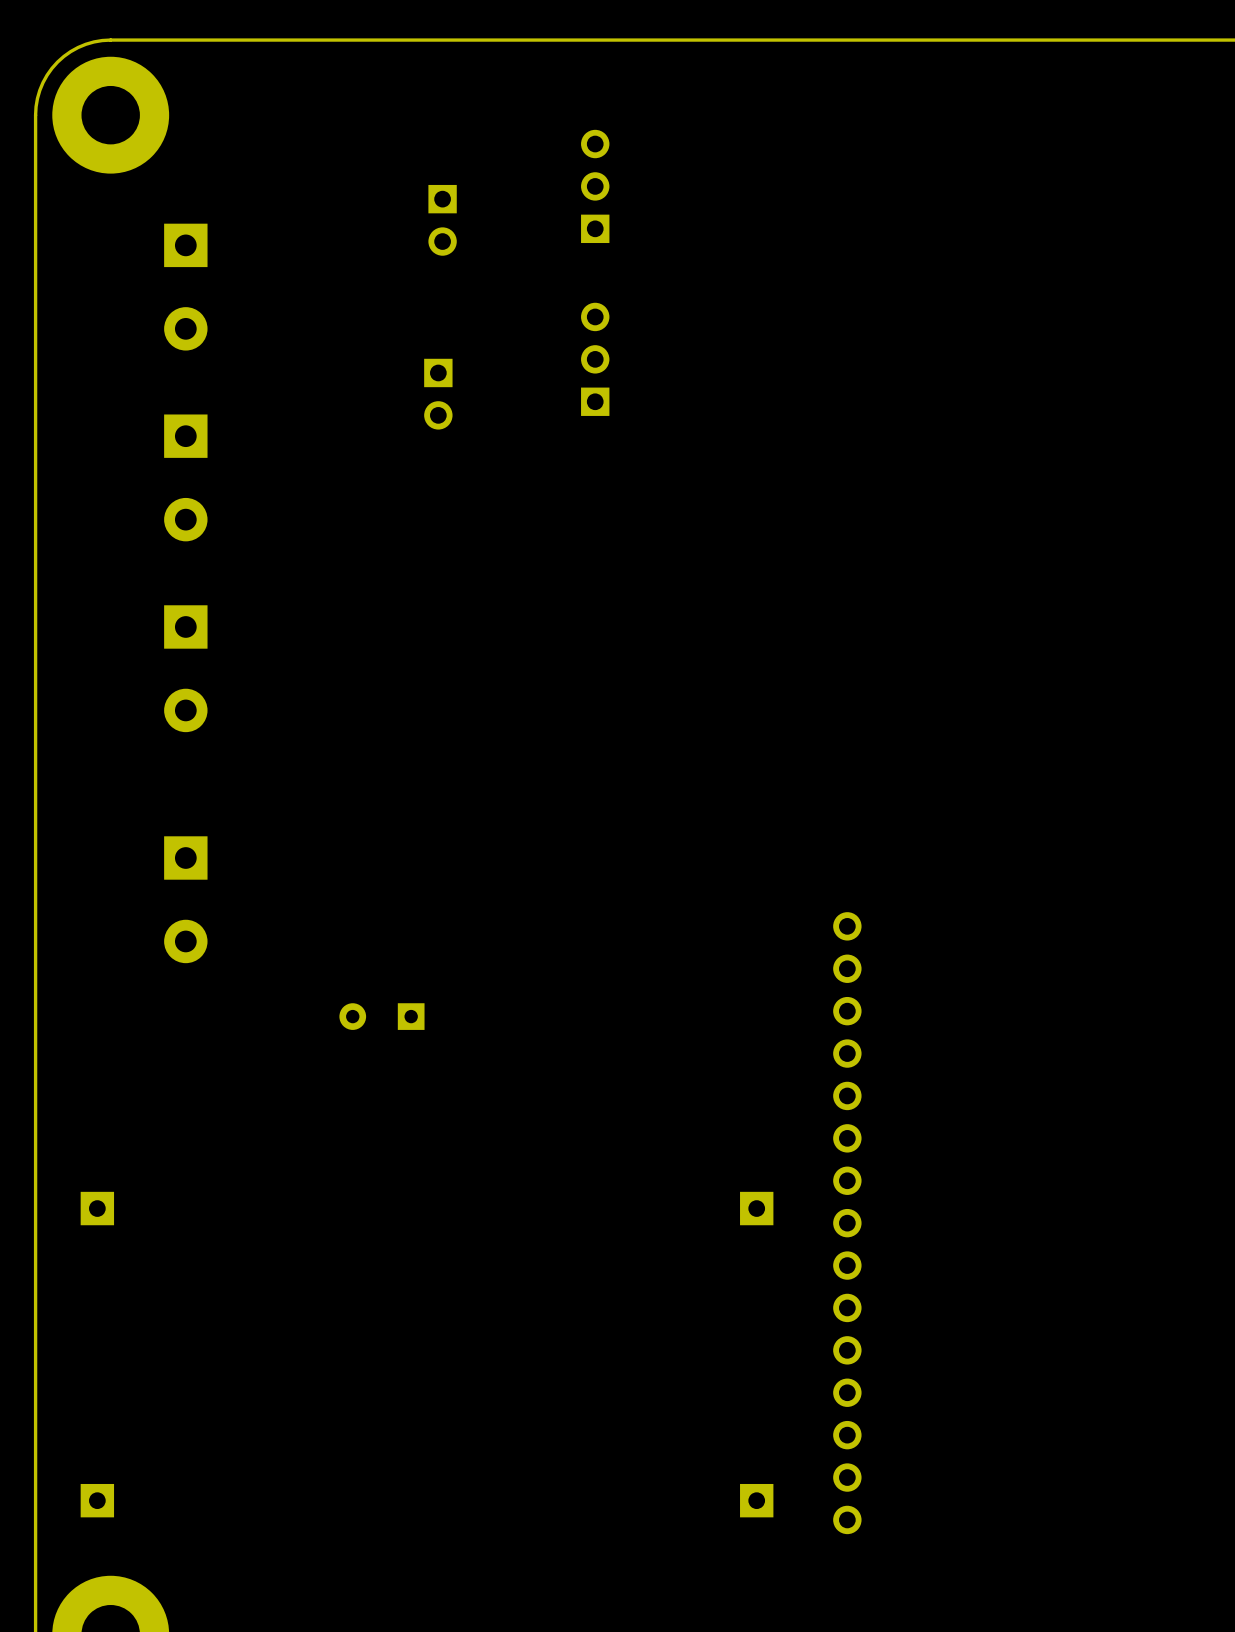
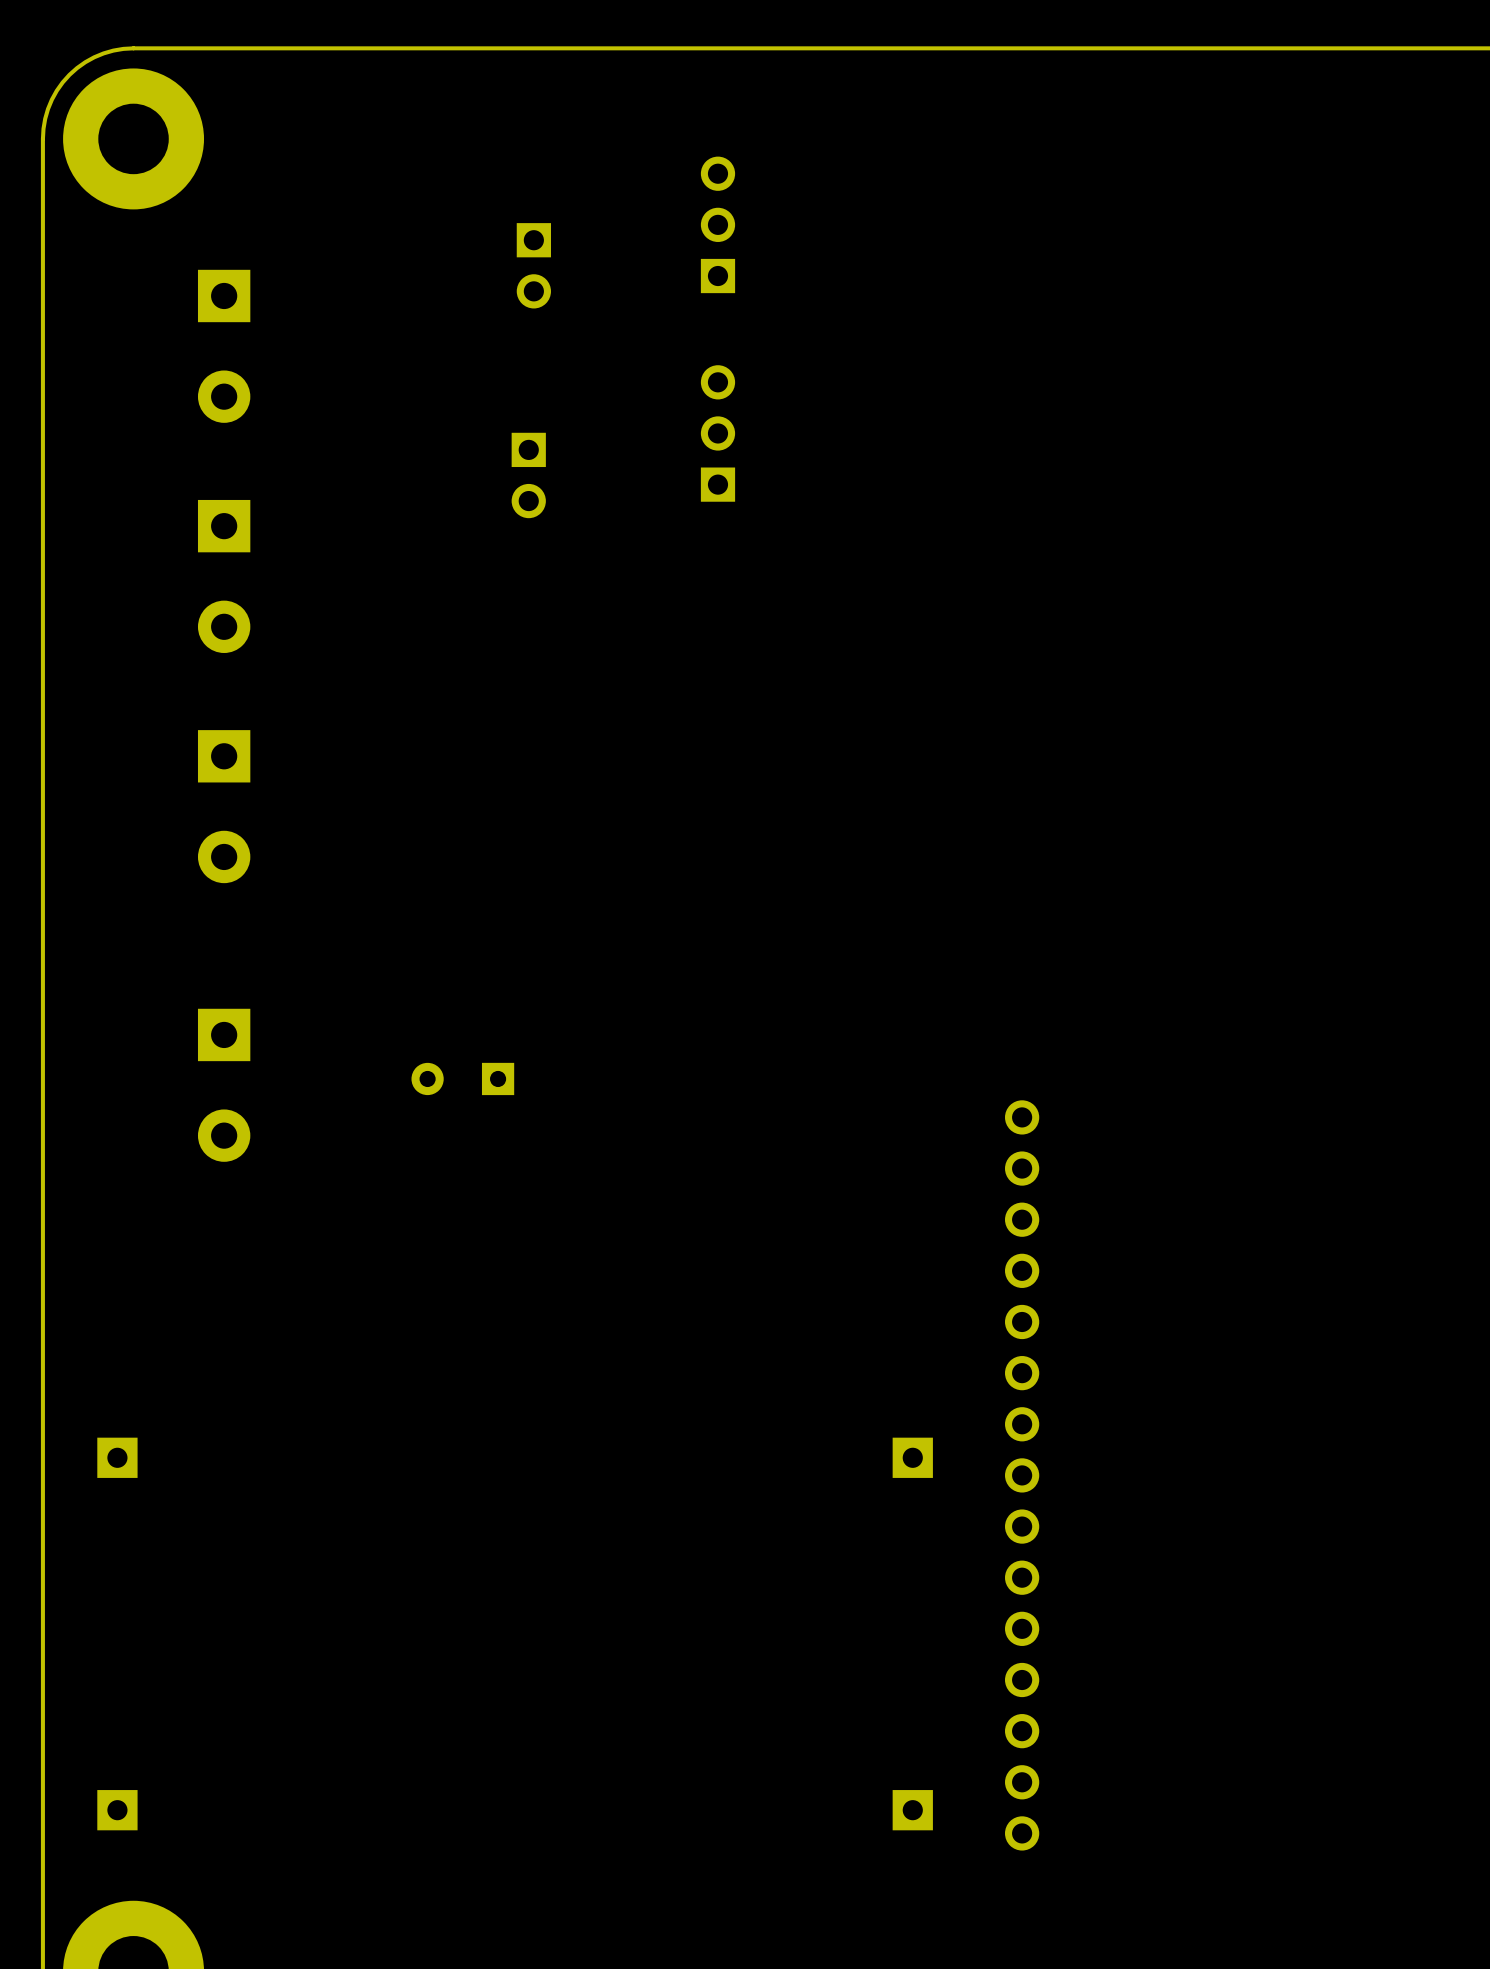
part position: (381, 1016) -> (462, 1078)

